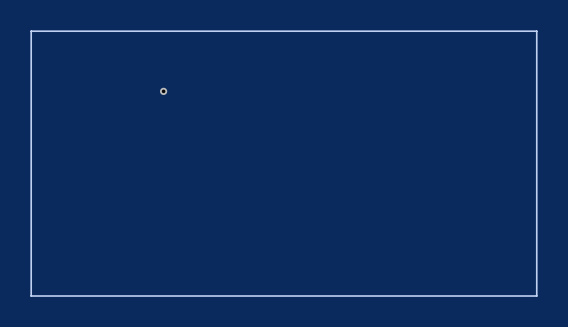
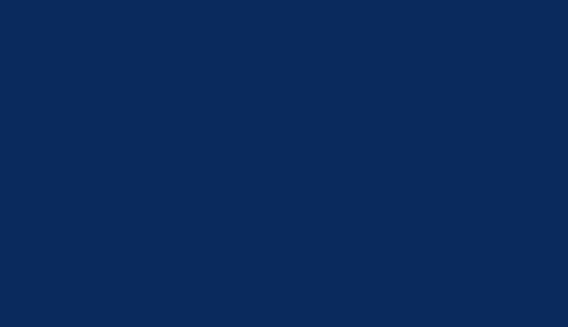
board edge: (536, 31) (31, 31) (31, 296) (536, 296) (536, 31) -> none
via: (163, 91) -> none

